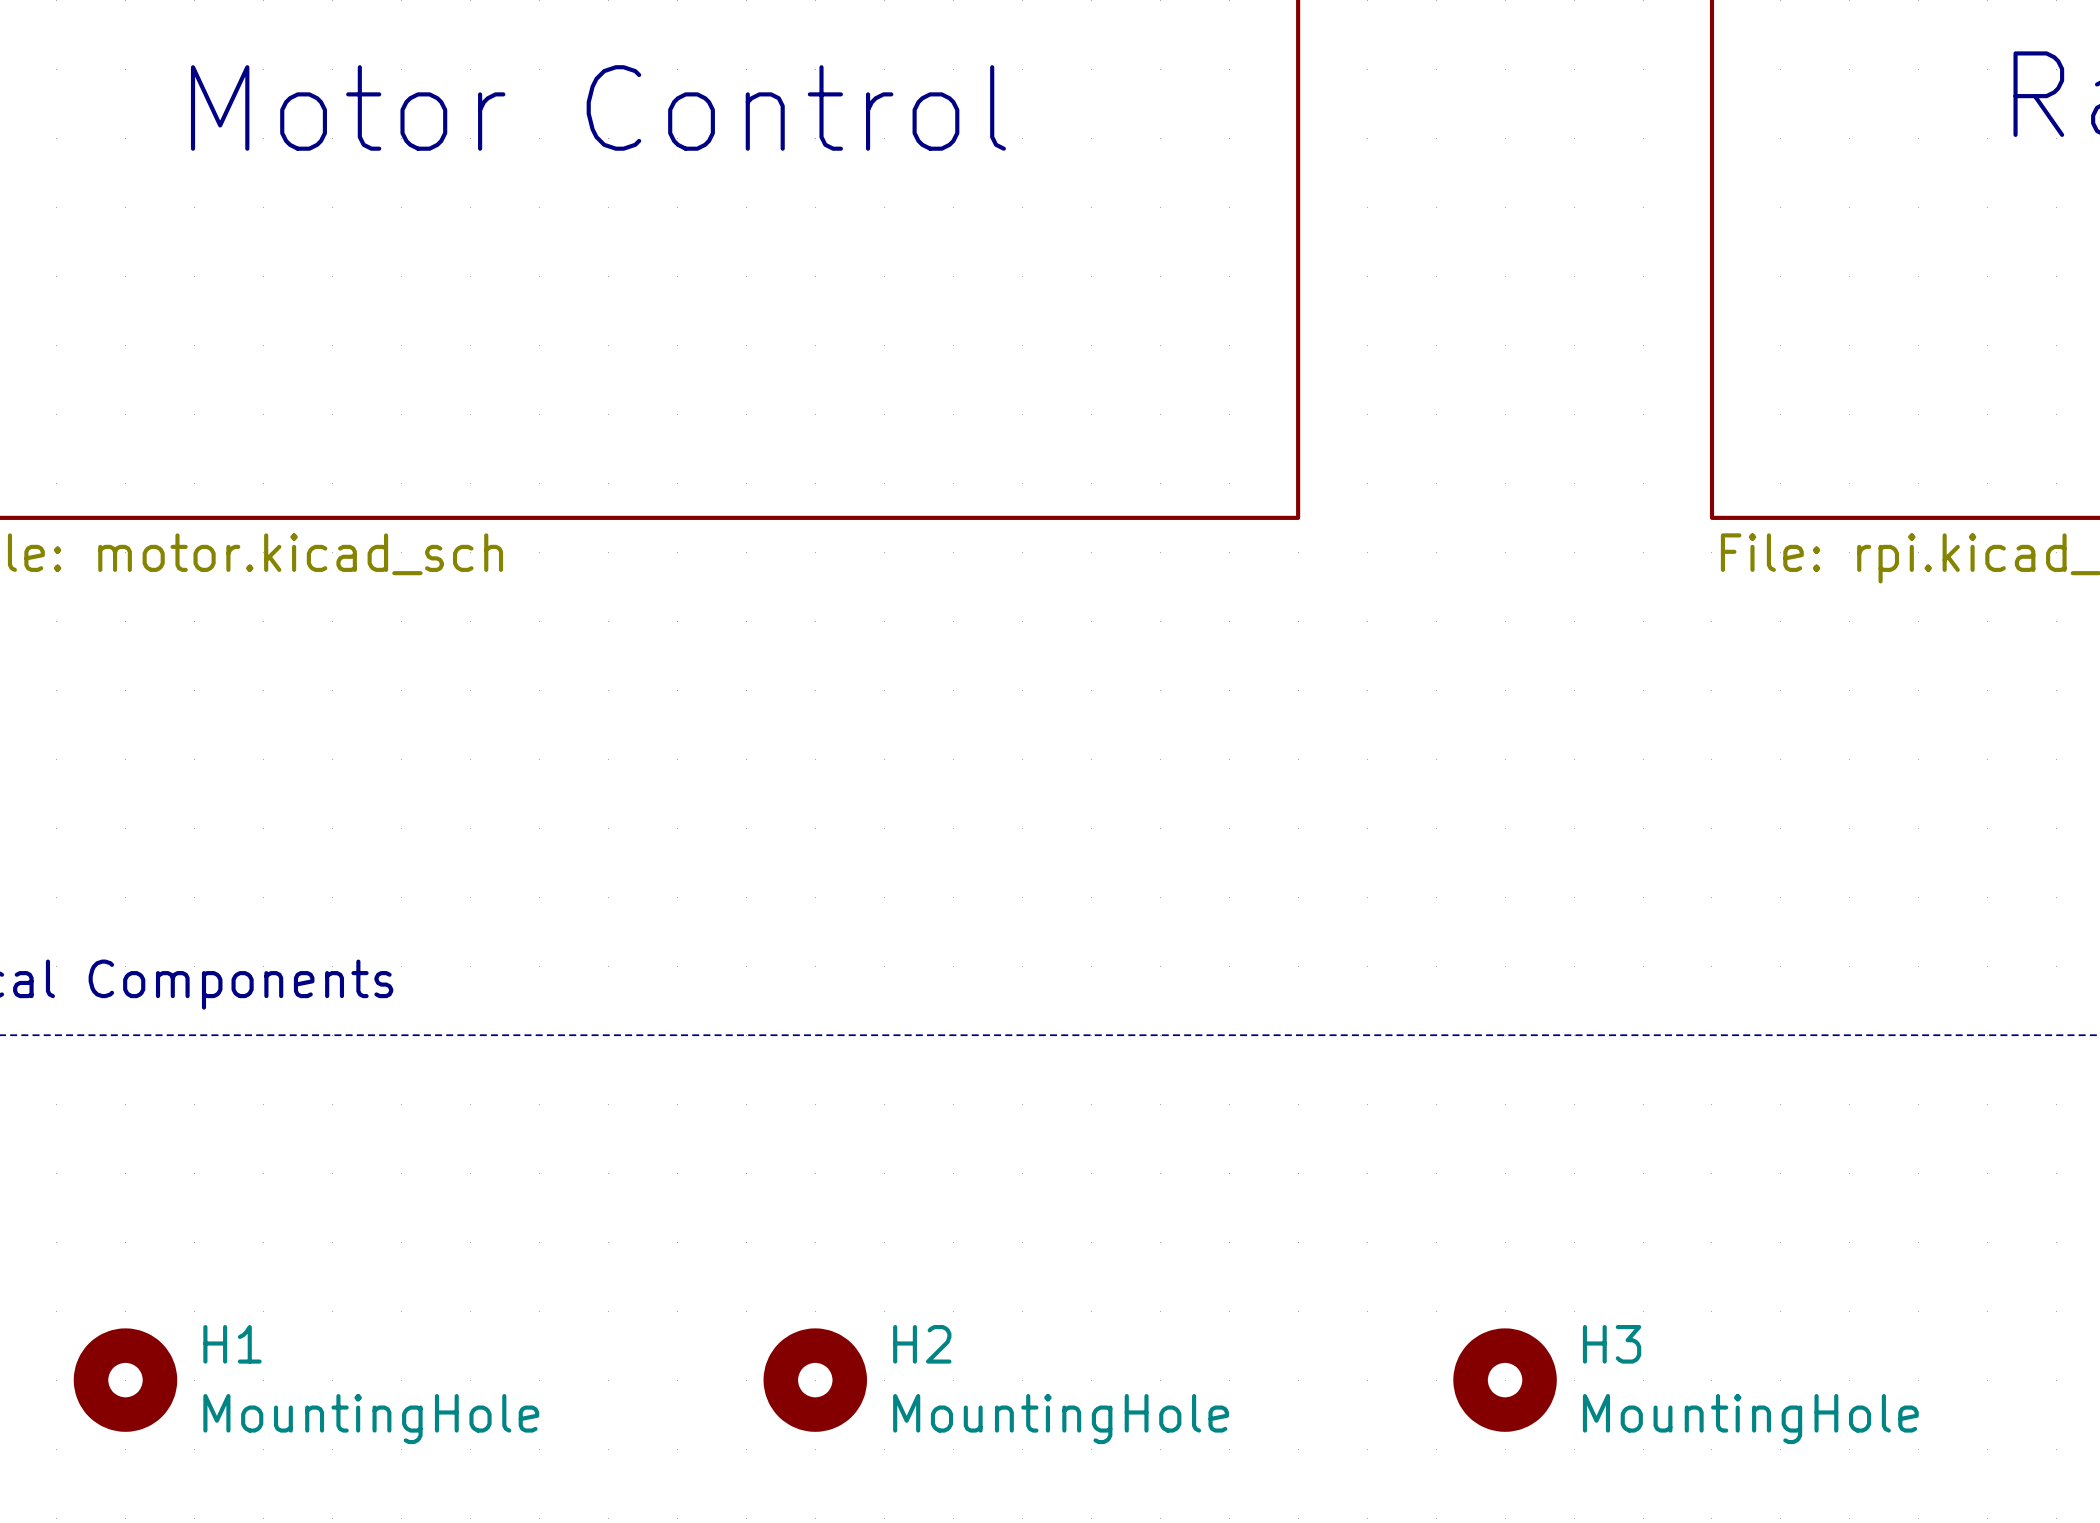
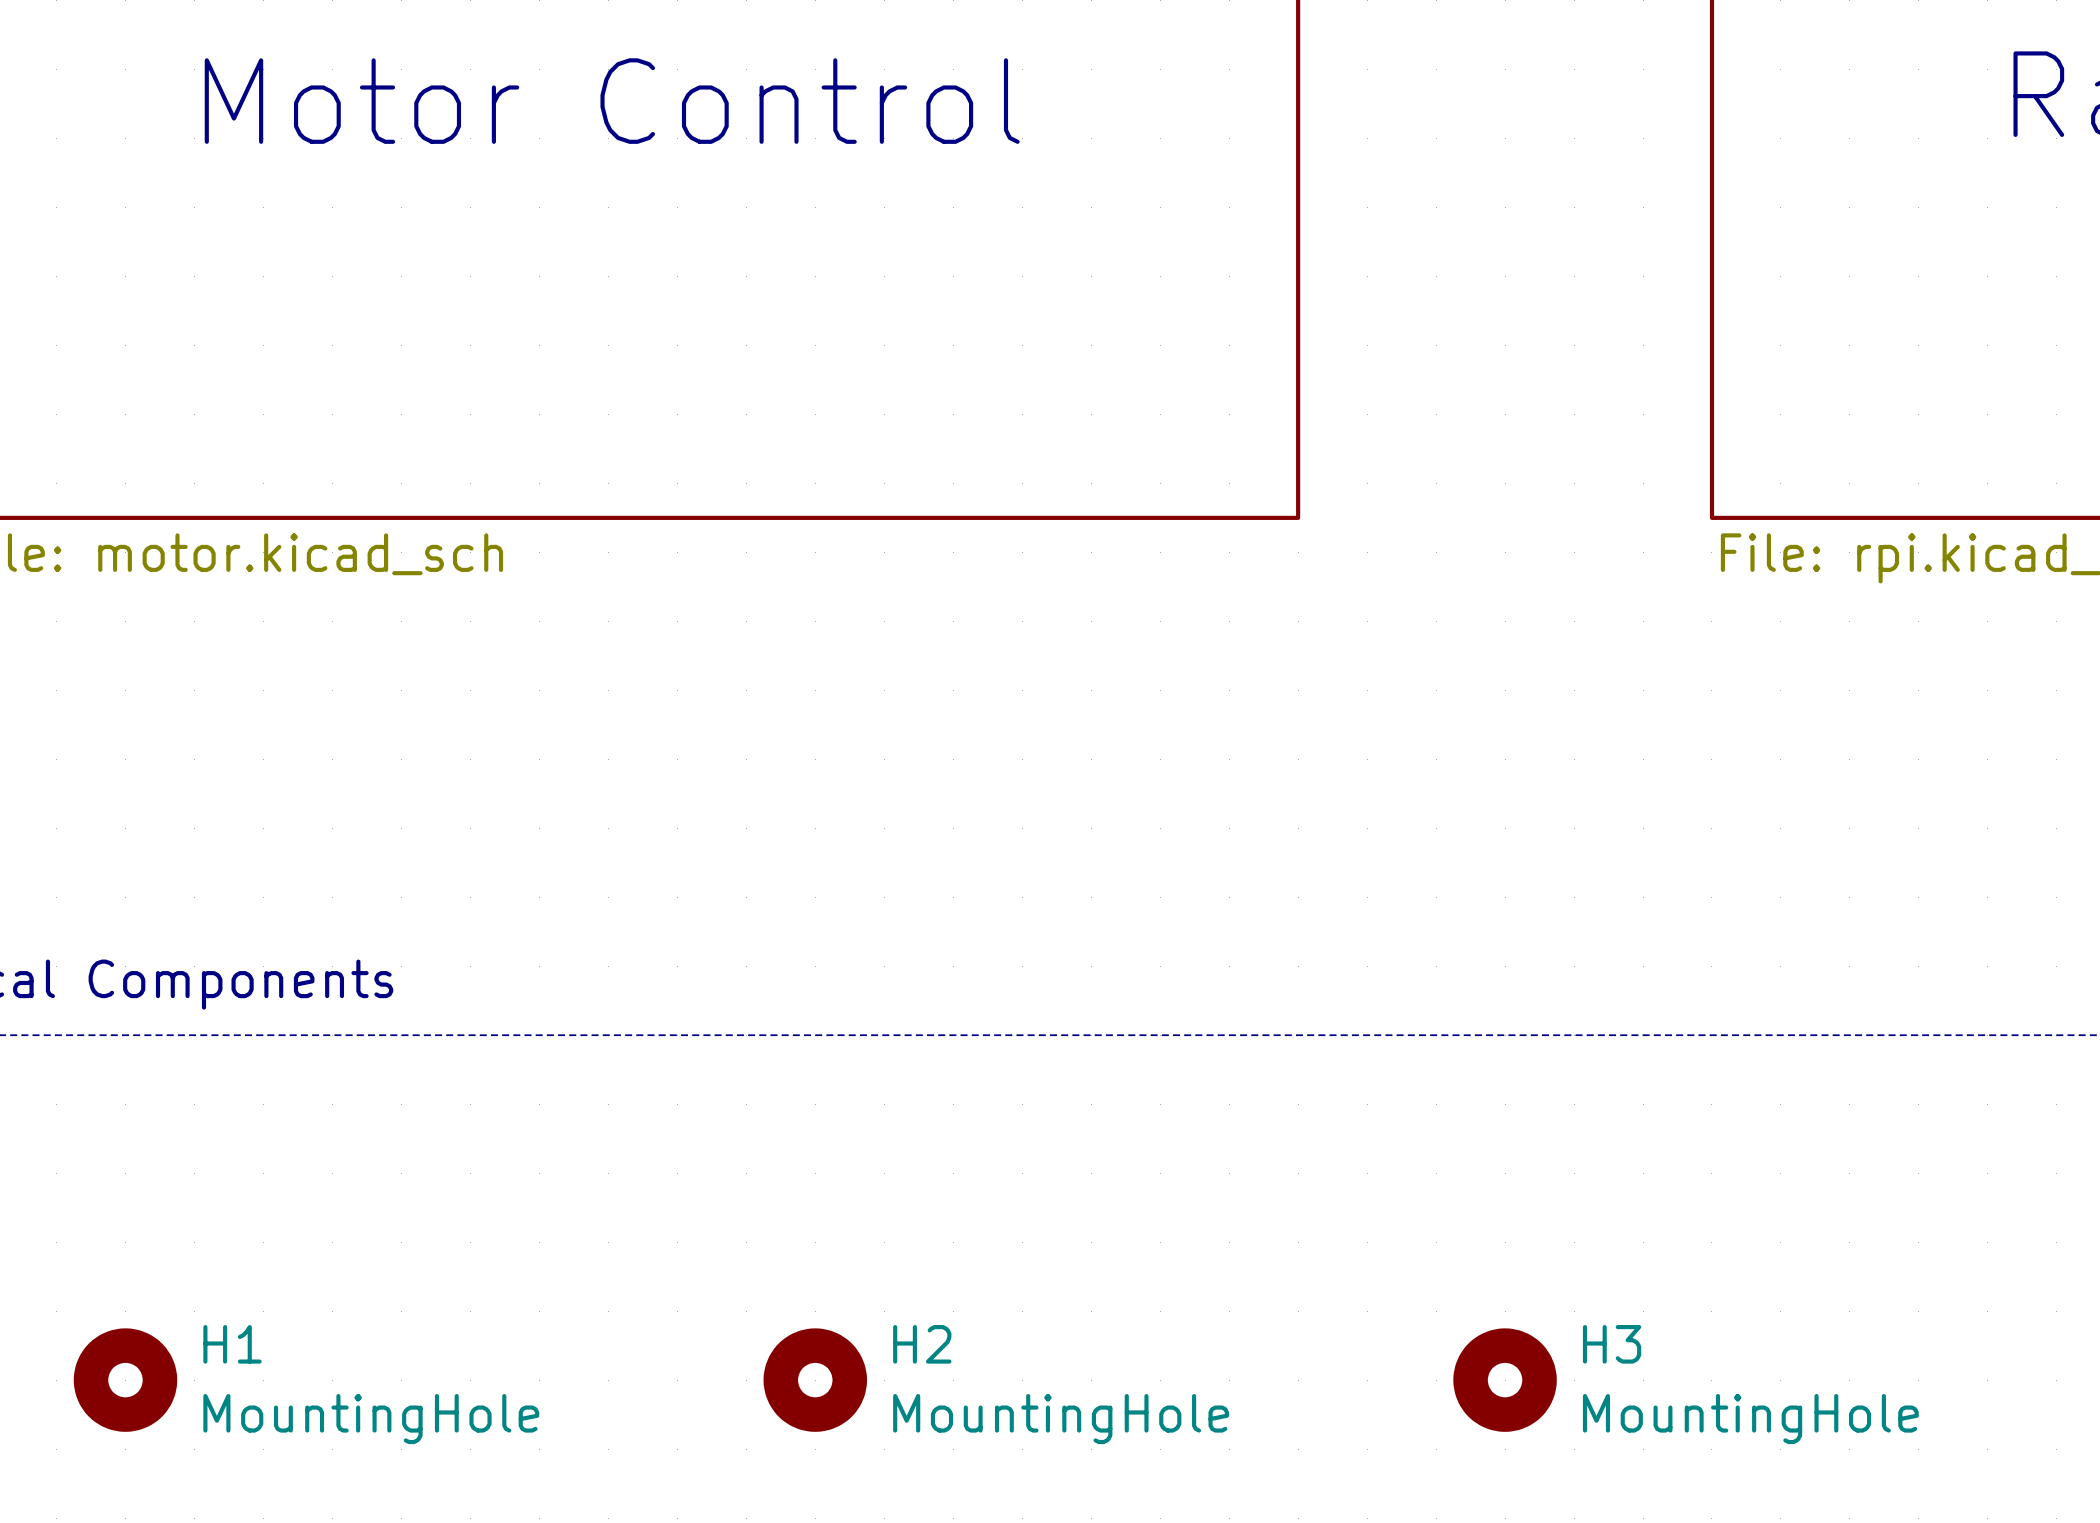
text position: Motor Control (598, 107) -> Motor Control (612, 101)

